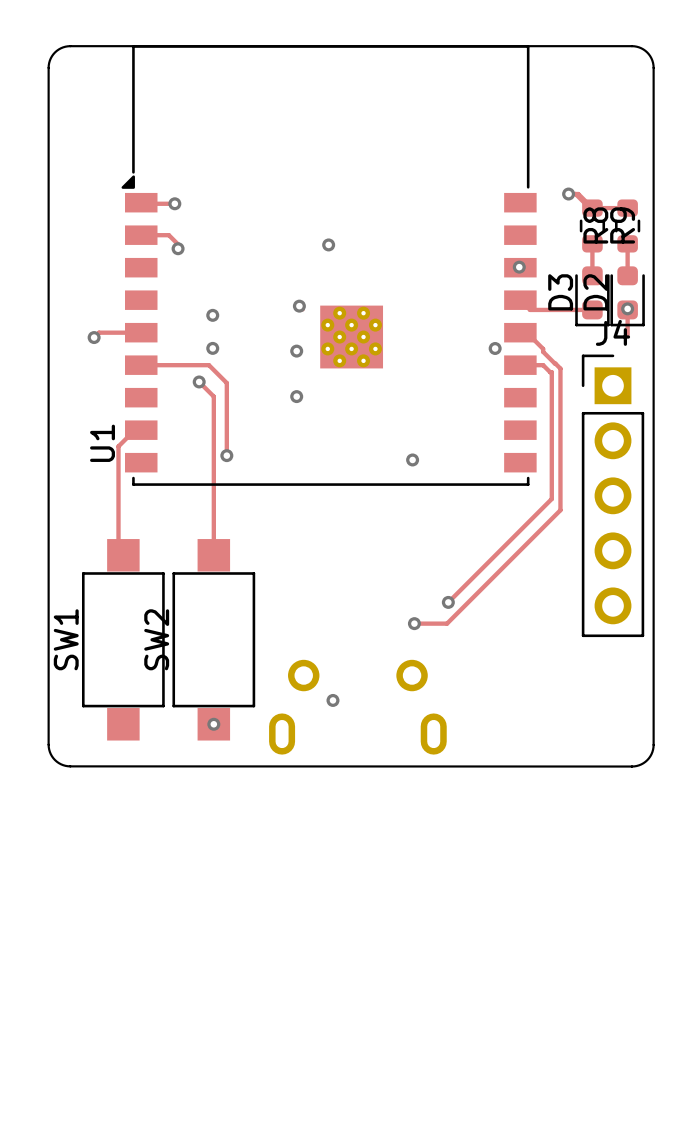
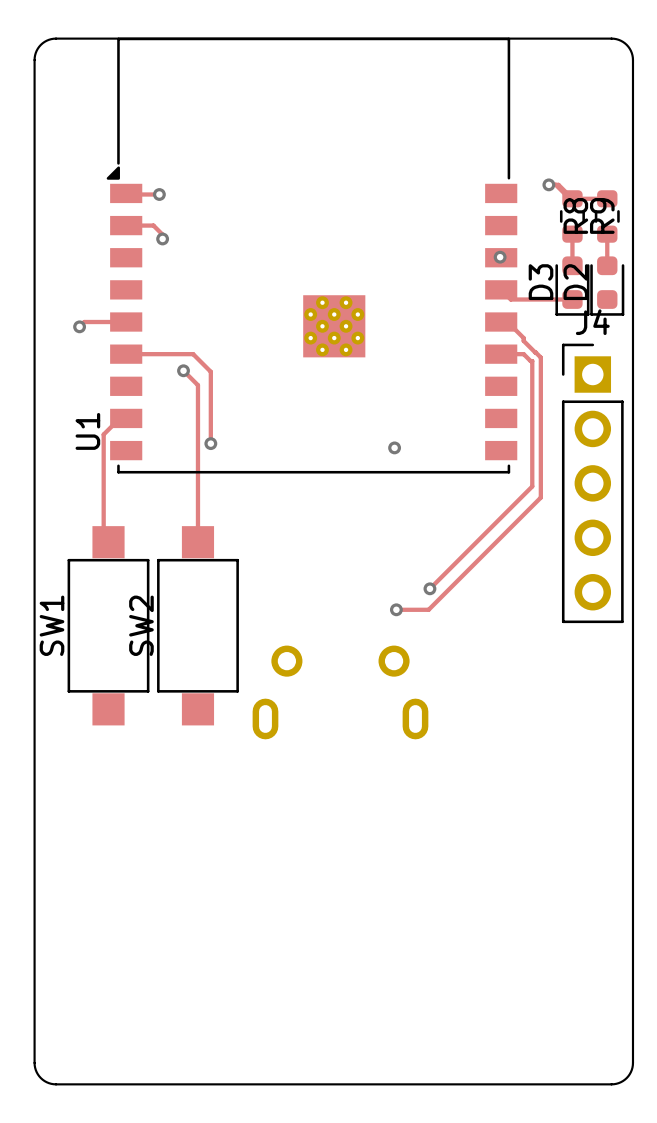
board edge: (48, 67) (48, 744) (53, 758) (60, 764) (70, 766) (631, 766) (639, 765) (647, 760) (651, 754) (653, 744) -> (34, 60) (34, 1062) (39, 1076) (46, 1082) (56, 1084) (611, 1084) (622, 1081) (629, 1074) (632, 1062) (632, 729)
via: (328, 244) -> none
via: (299, 306) -> none
track: (627, 308) (627, 334) -> none
via: (627, 308) -> none
via: (212, 315) -> none
via: (212, 348) -> none
via: (495, 348) -> none
via: (296, 351) -> none
via: (296, 396) -> none
via: (332, 700) -> none
via: (213, 724) -> none

